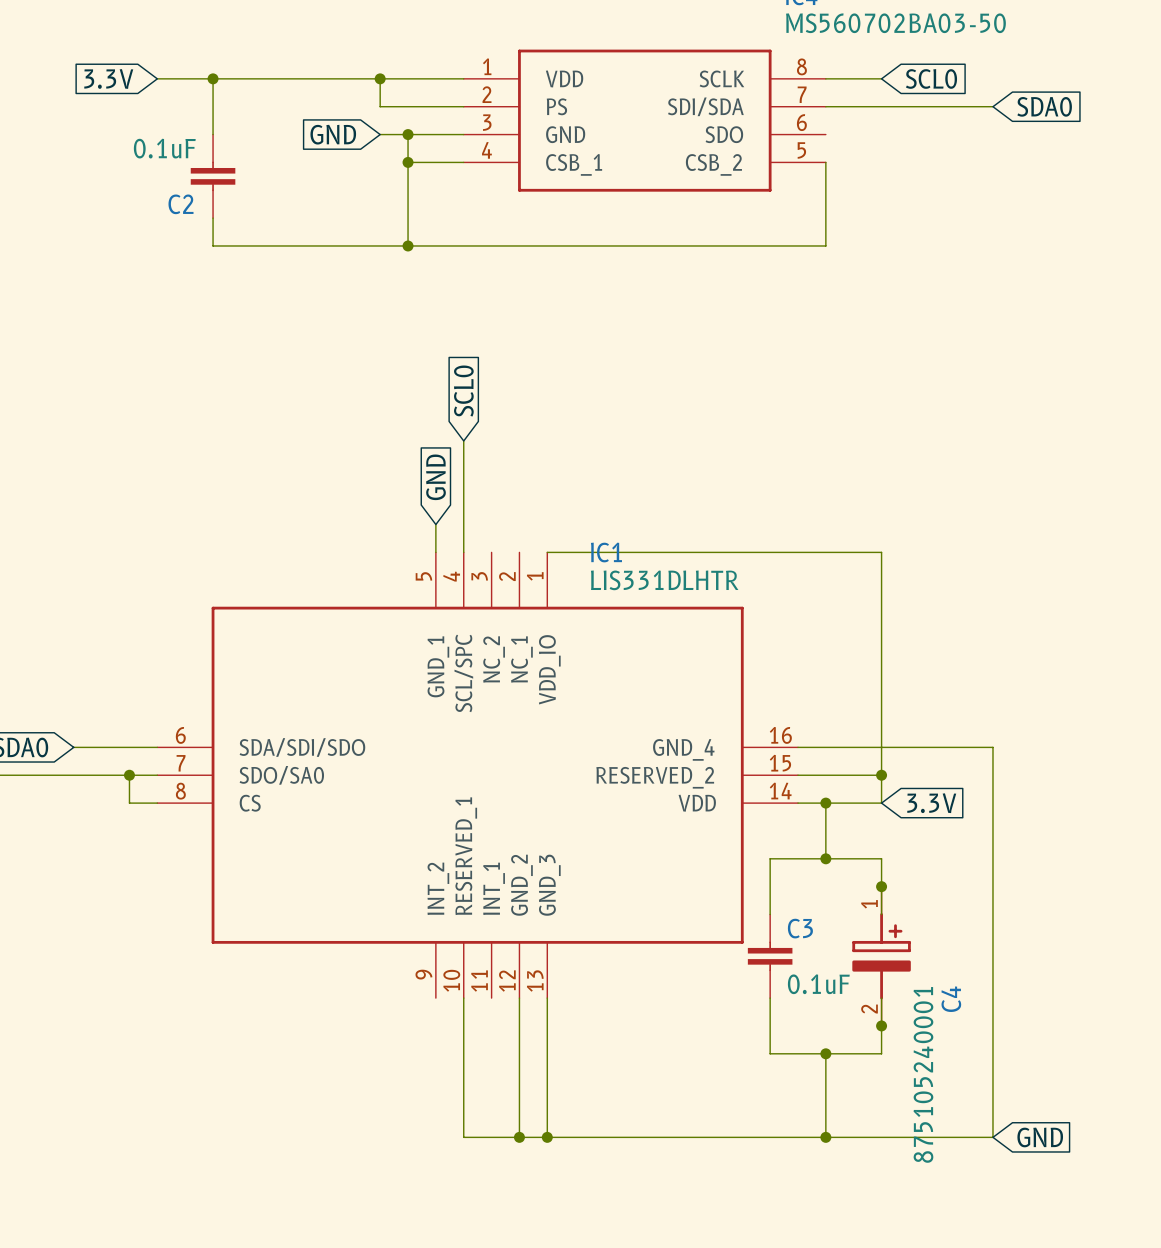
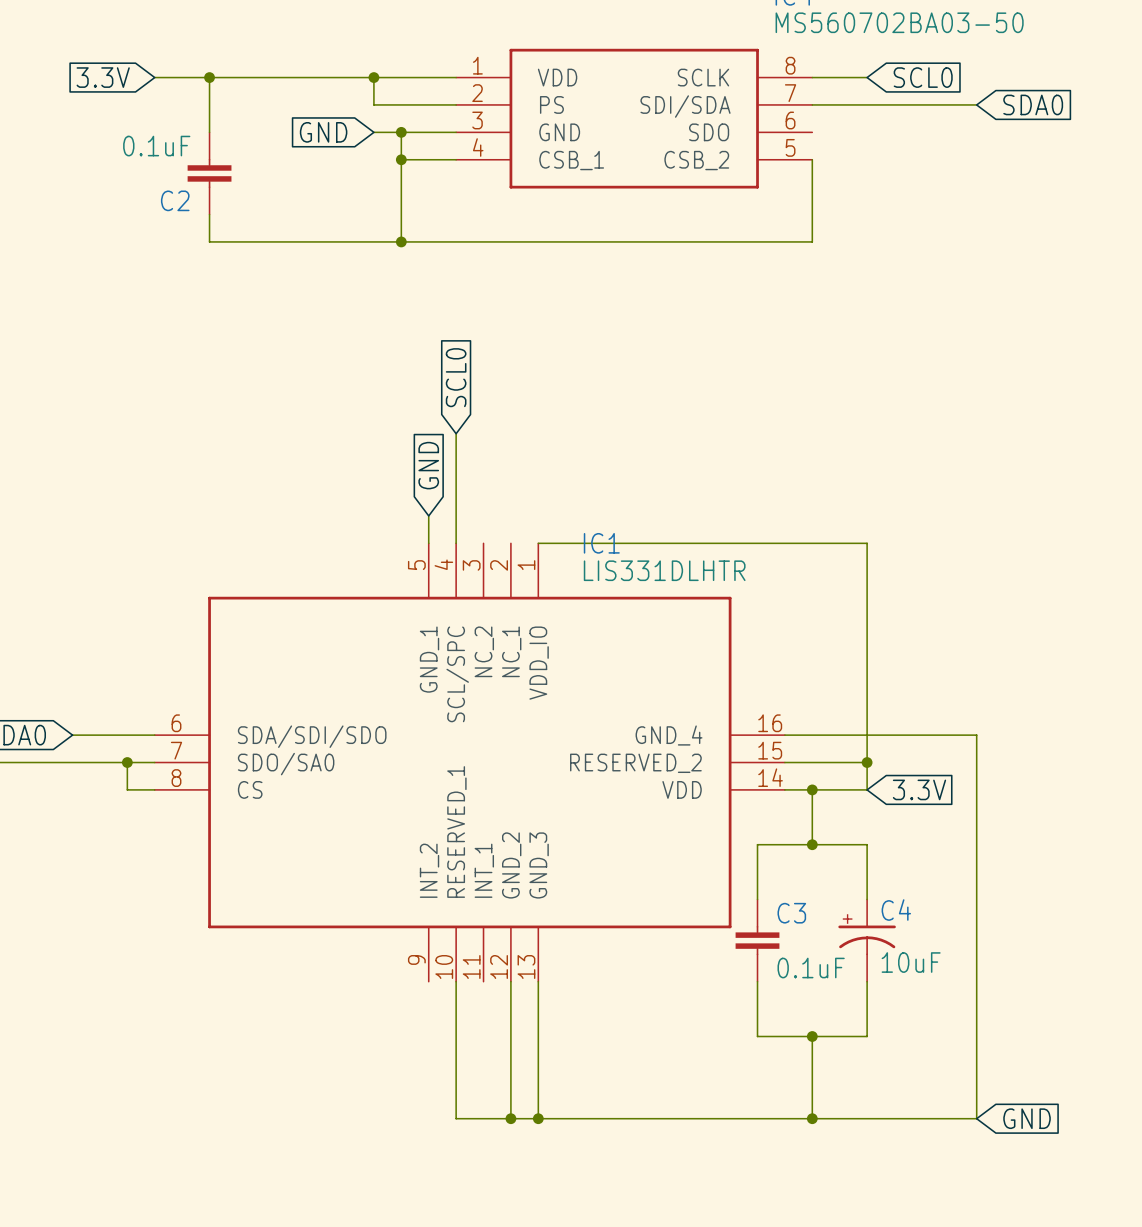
C4 symbol: [852, 886, 911, 1026] -> [838, 899, 896, 982]
junction: (881, 886) -> none
C4 name position: C4 (951, 999) -> C4 (896, 910)
junction: (881, 1025) -> none
C4 value: 875105240001 (923, 1074) -> 10uF (911, 962)

